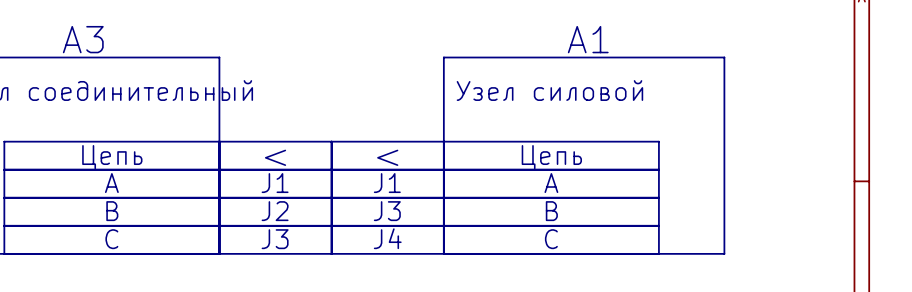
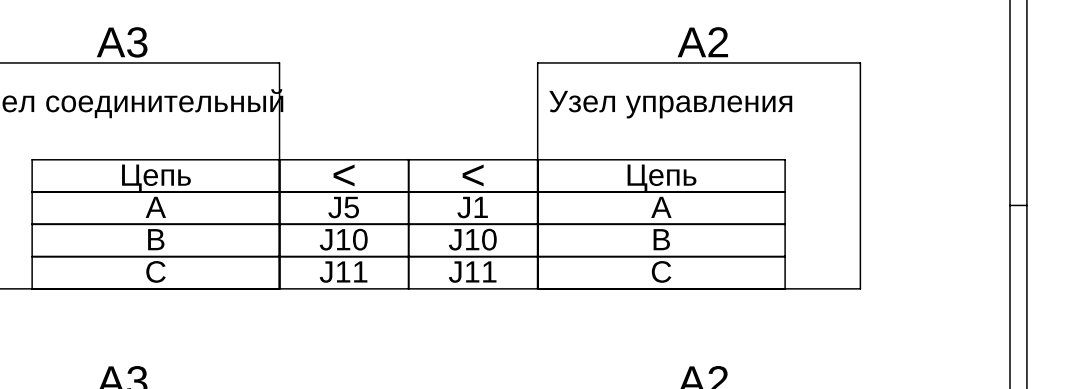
text: A1 (588, 39) -> A2 (702, 42)
text: Узел силовой (549, 90) -> Узел управления (670, 104)
text: J1 (275, 183) -> J5 (343, 207)
text: J2 (275, 211) -> J10 (343, 239)
text: J3 (387, 211) -> J10 (472, 239)
text: J4 (387, 238) -> J11 (472, 272)
text: J3 (275, 239) -> J11 (343, 272)

